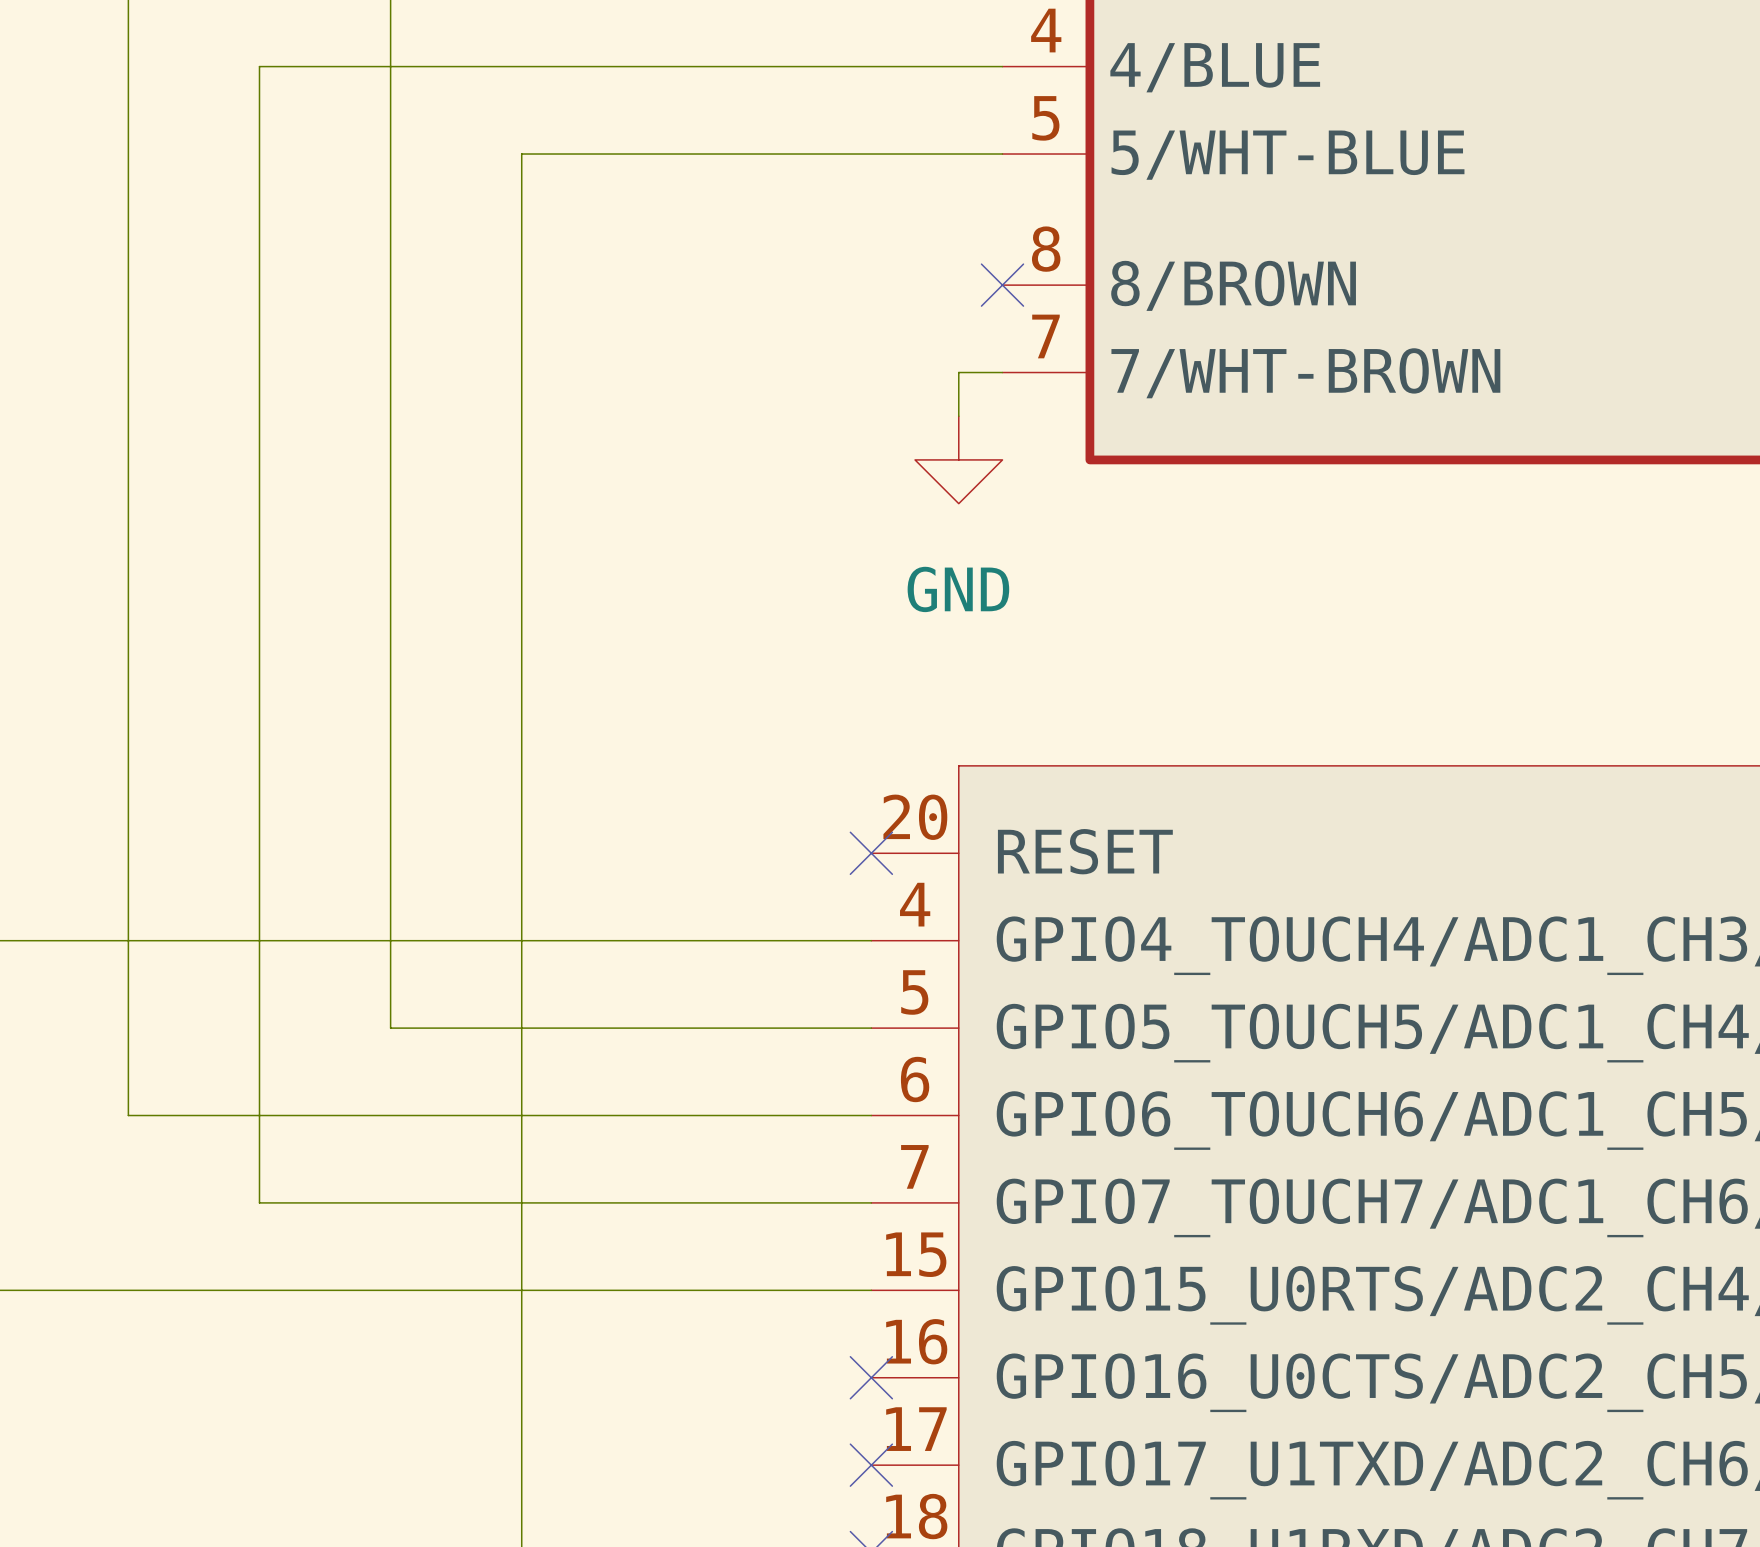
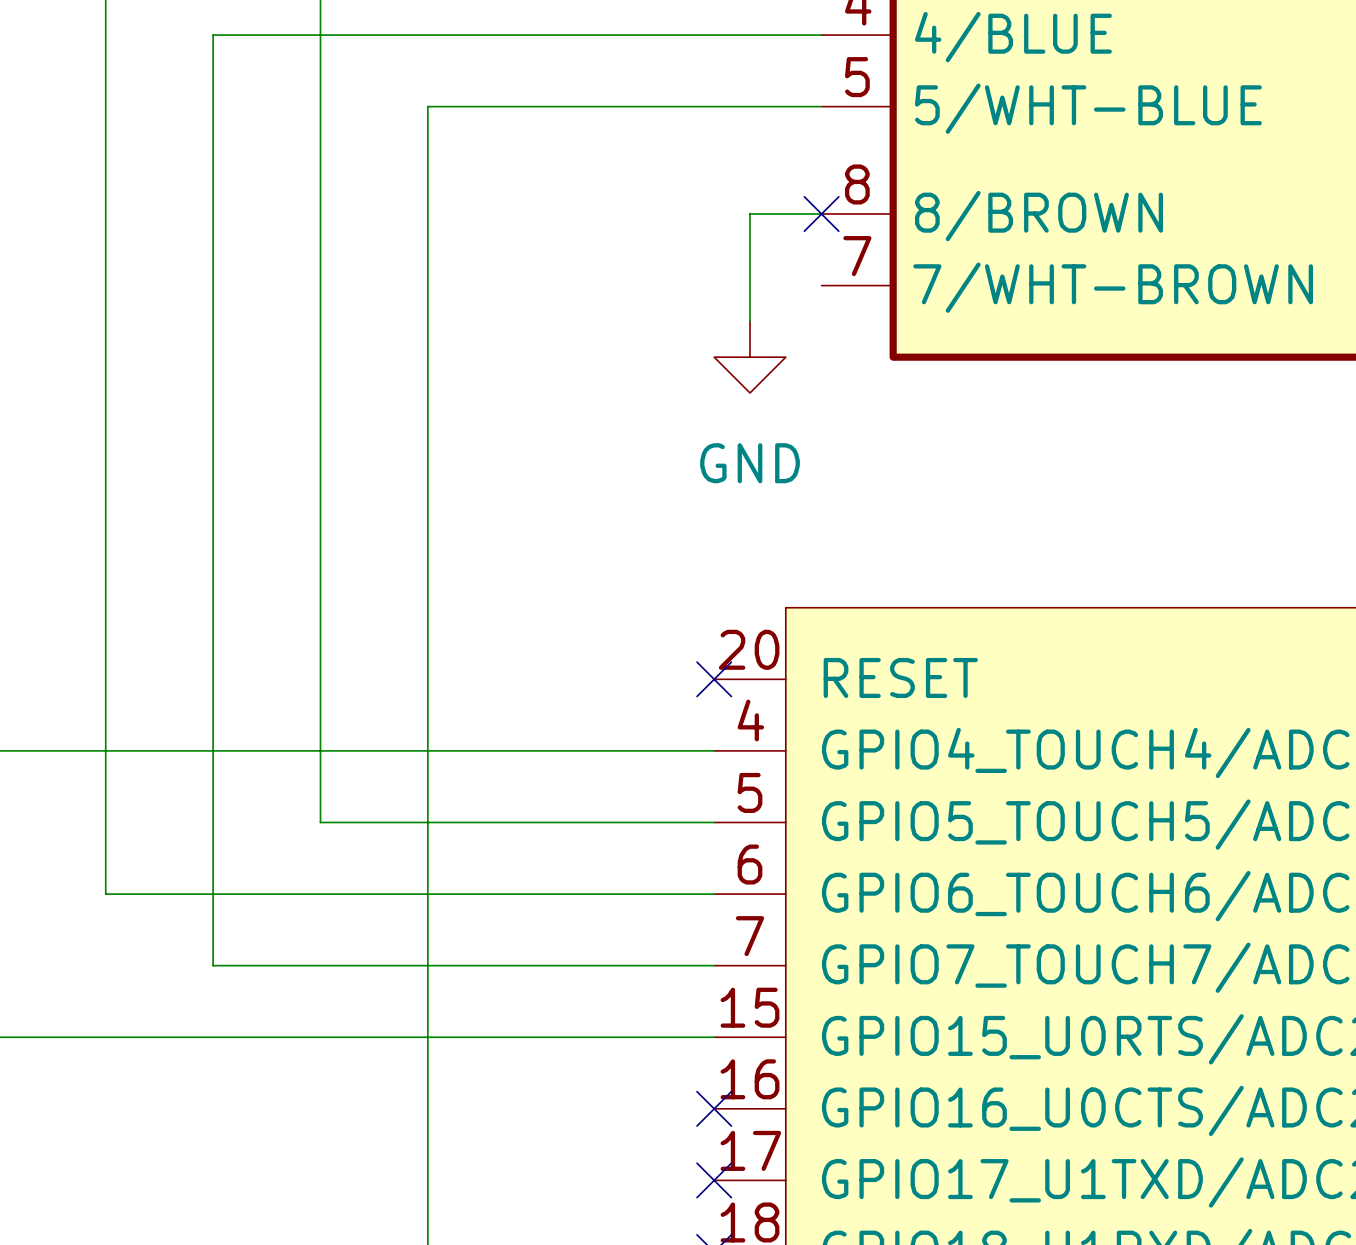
wire: none -> (821, 214) (750, 214) (750, 321)
wire: (1002, 372) (958, 372) (958, 416) -> none
power symbol position: GND (958, 459) -> GND (750, 357)

